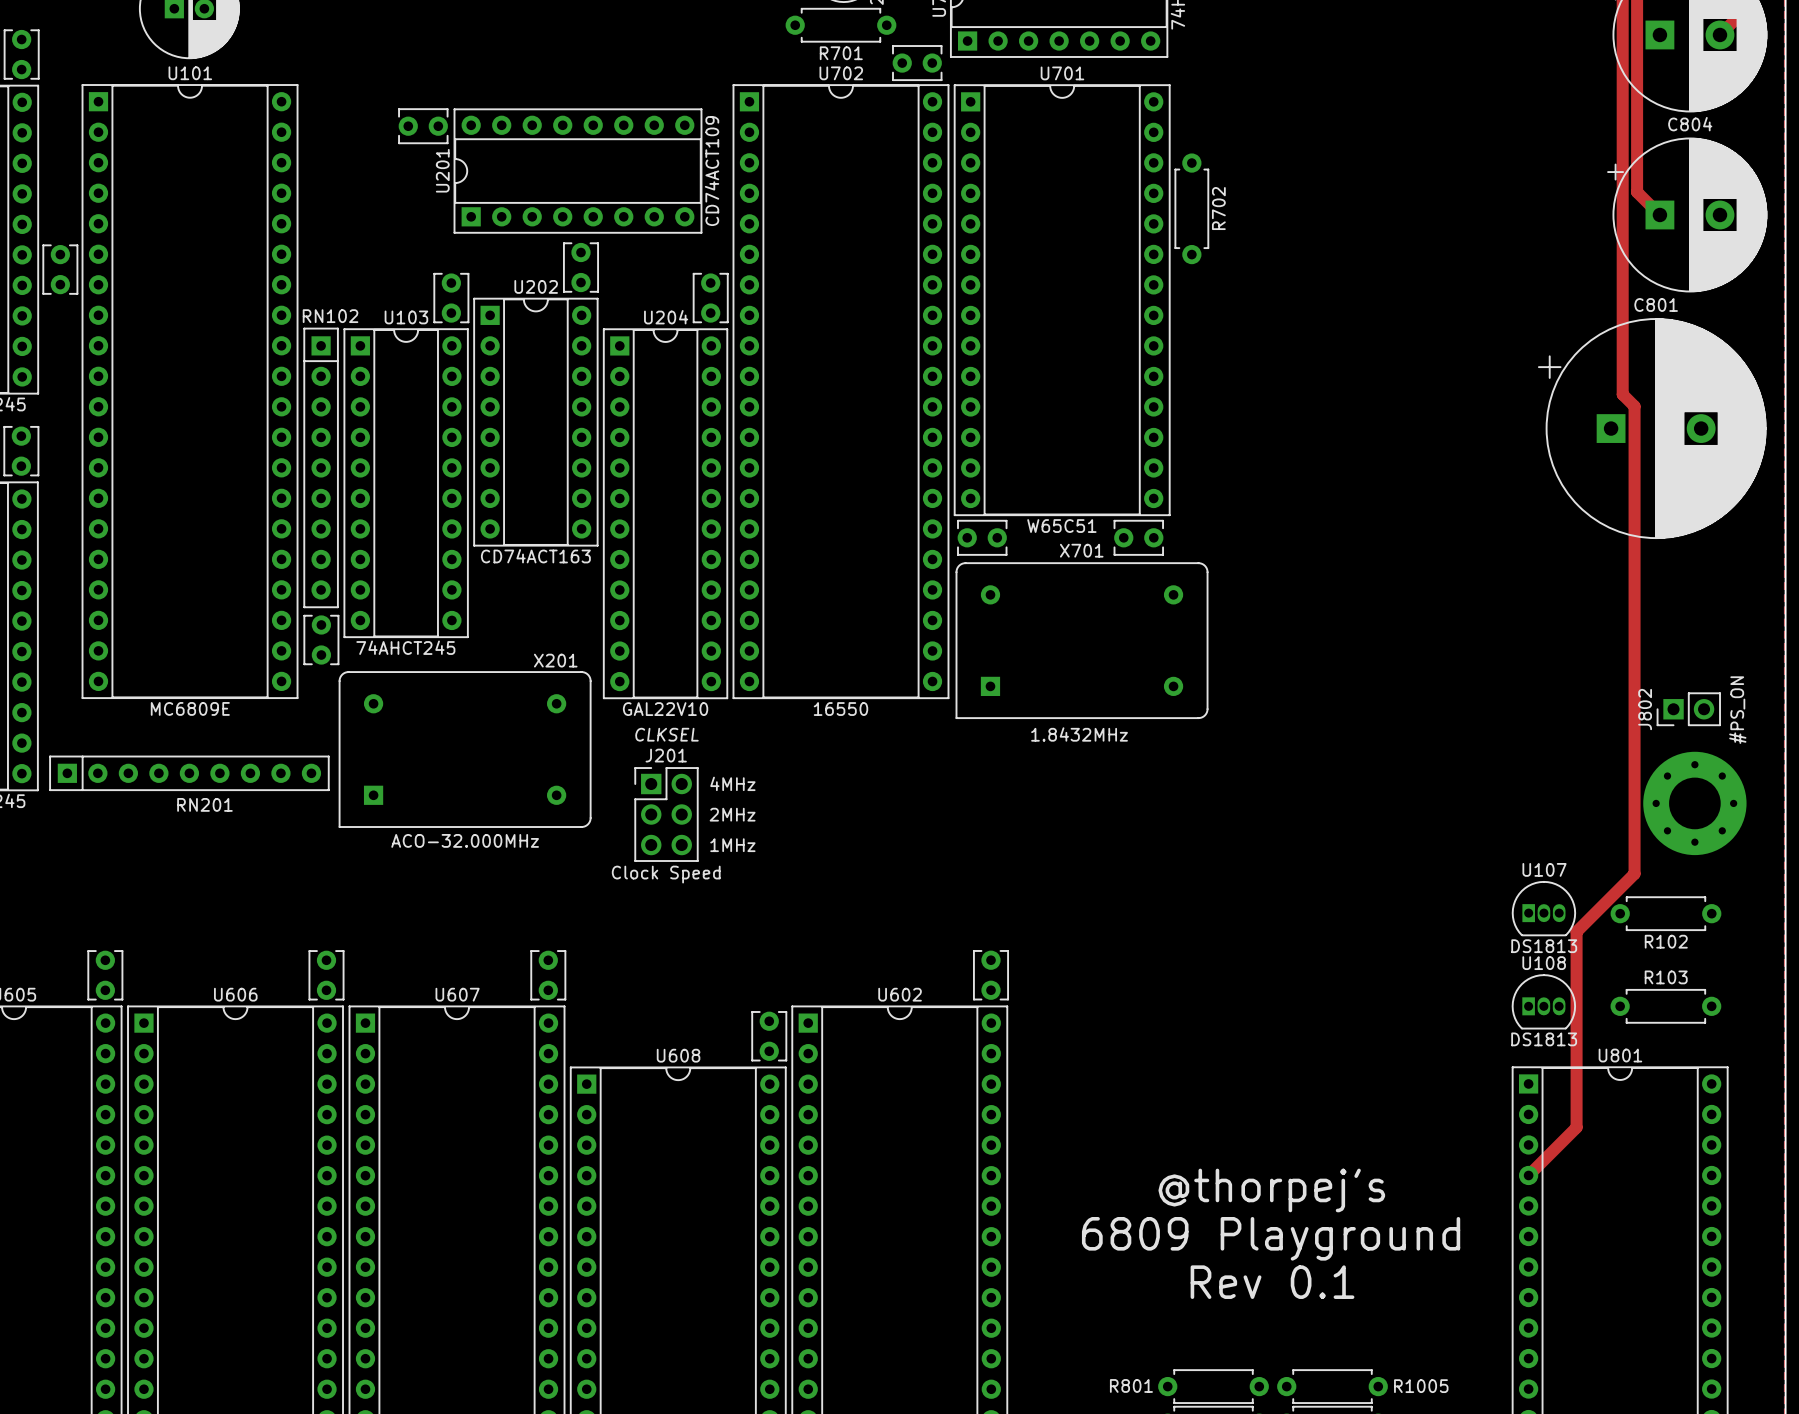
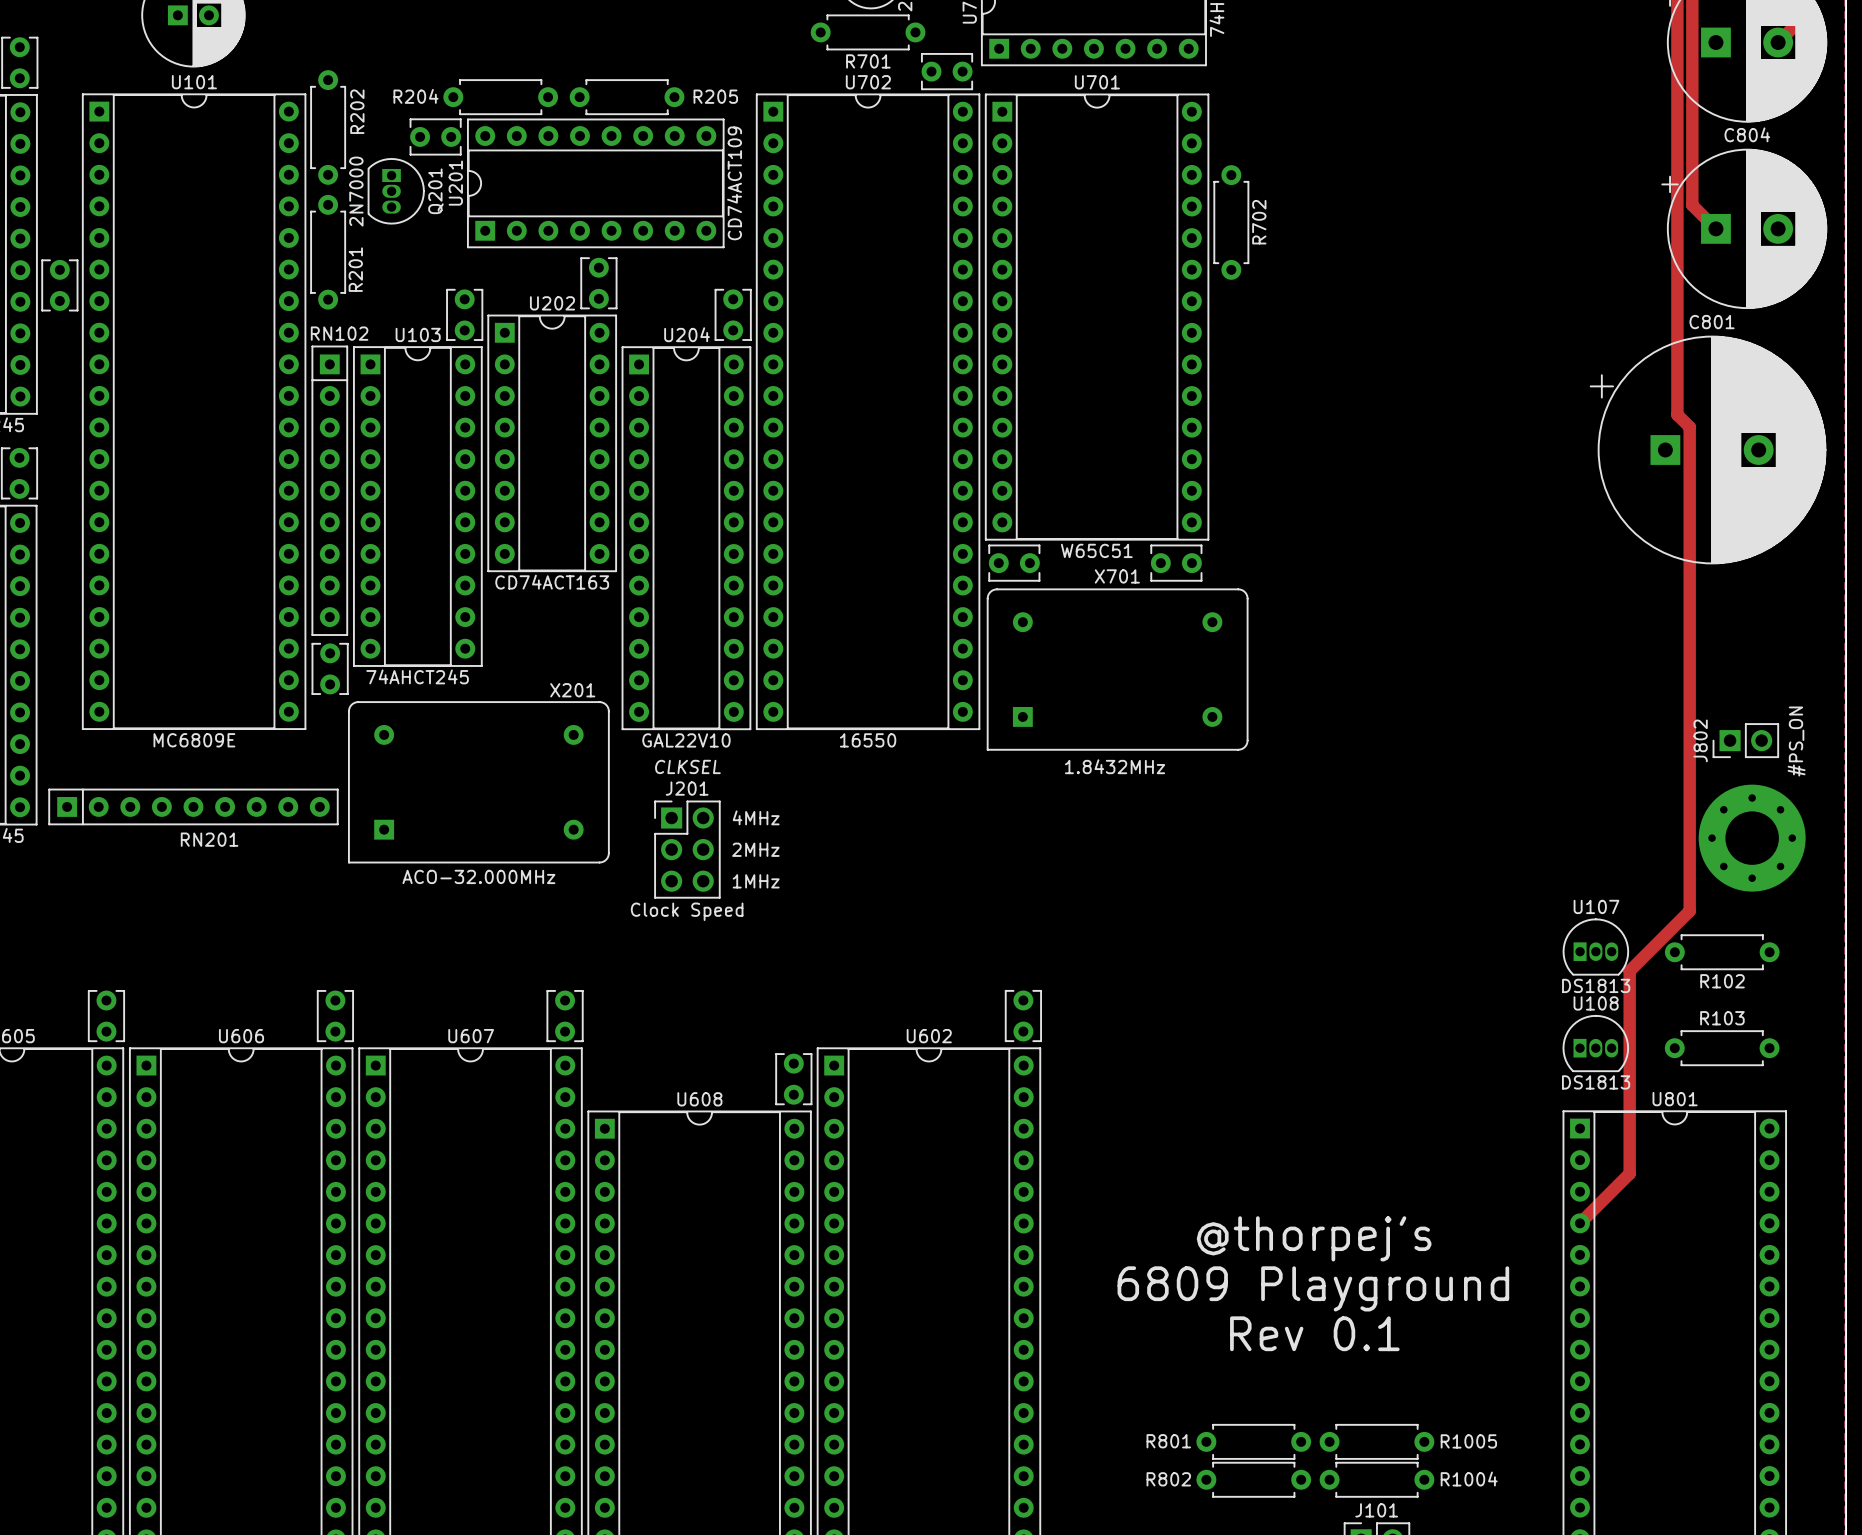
R204: none -> (500, 97)
R205: none -> (627, 97)
R202: none -> (328, 127)
Q201: none -> 2N7000 (396, 191)
R201: none -> (328, 252)

